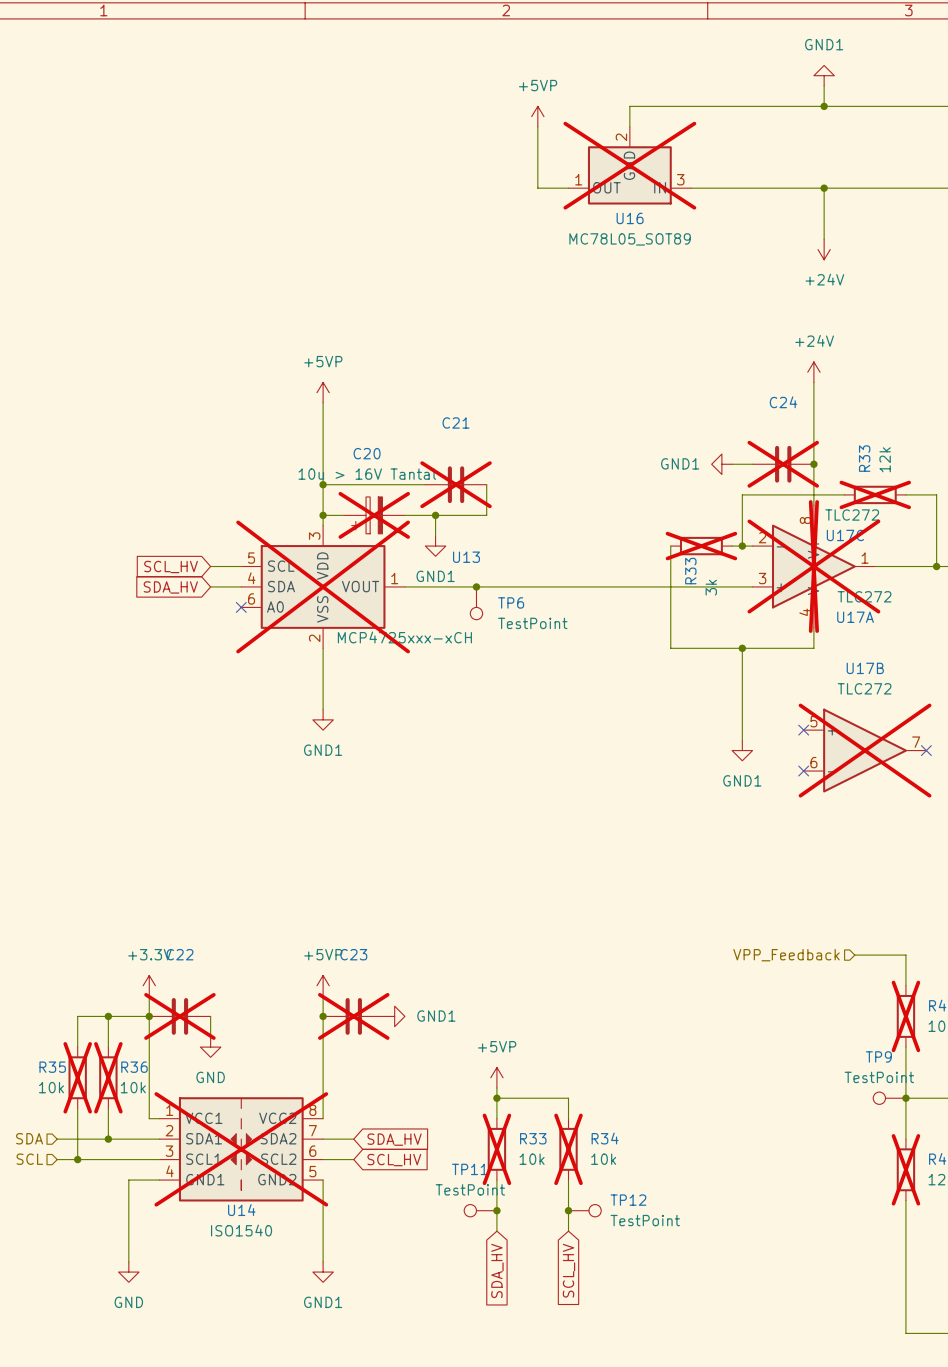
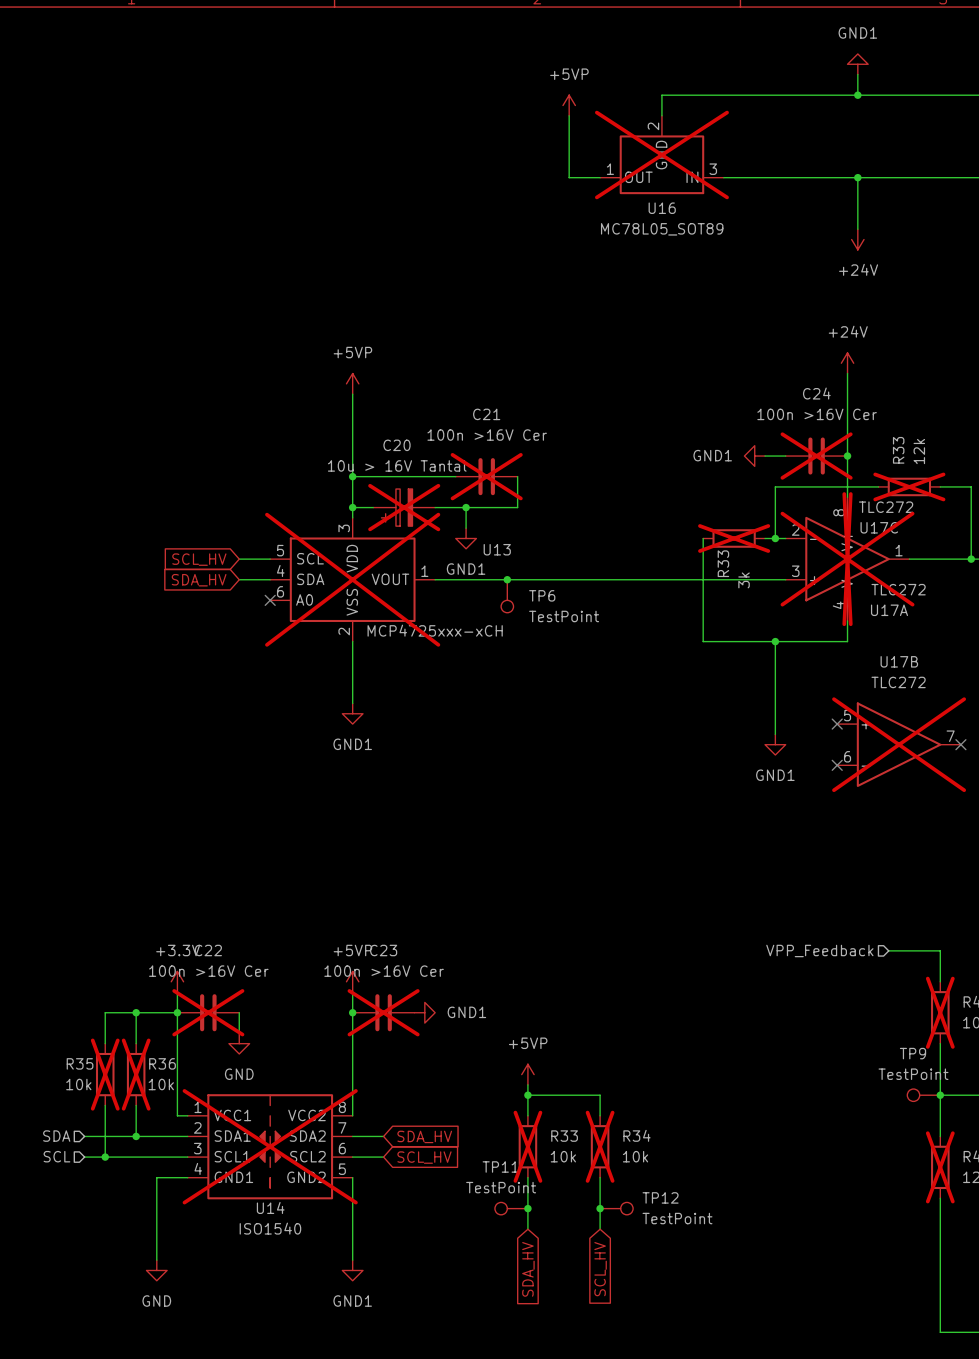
C24 value: none -> 100n >16V Cer (817, 414)
C21 value: none -> 100n >16V Cer (487, 435)
C22 value: none -> 100n >16V Cer (208, 971)
C23 value: none -> 100n >16V Cer (384, 971)

